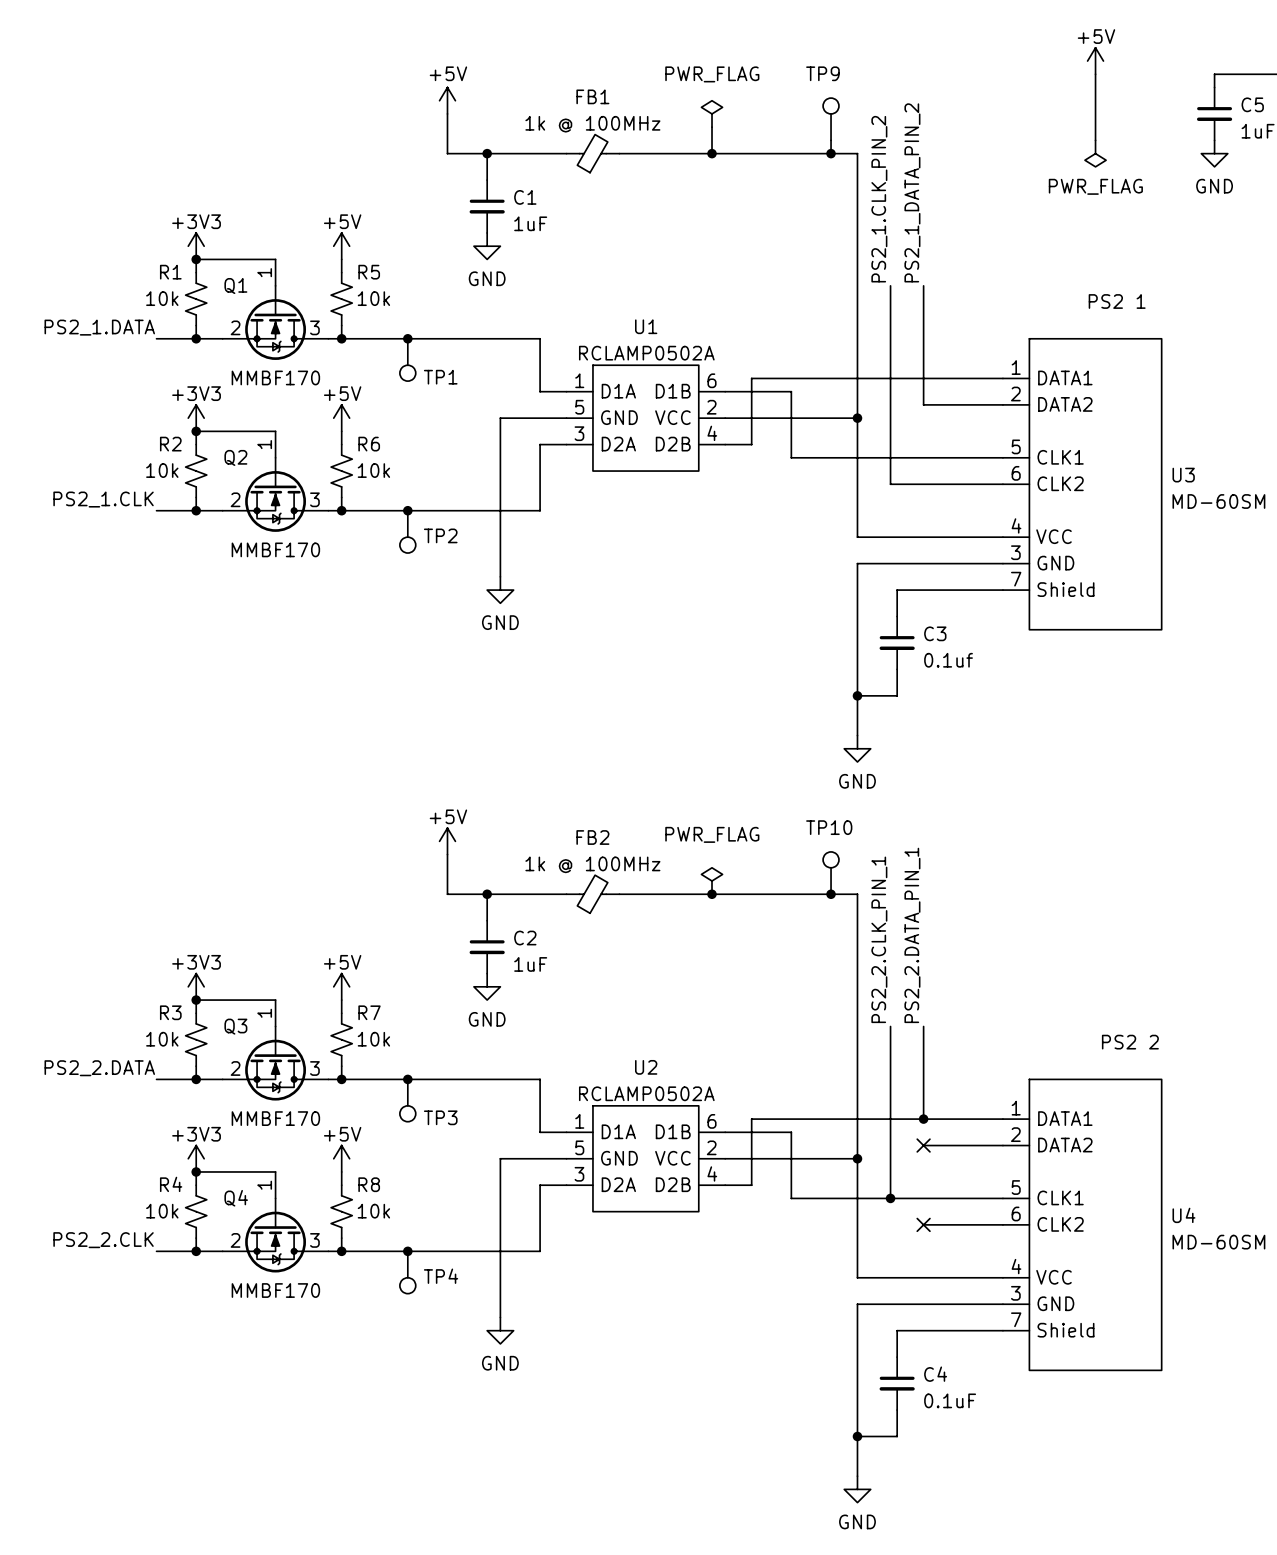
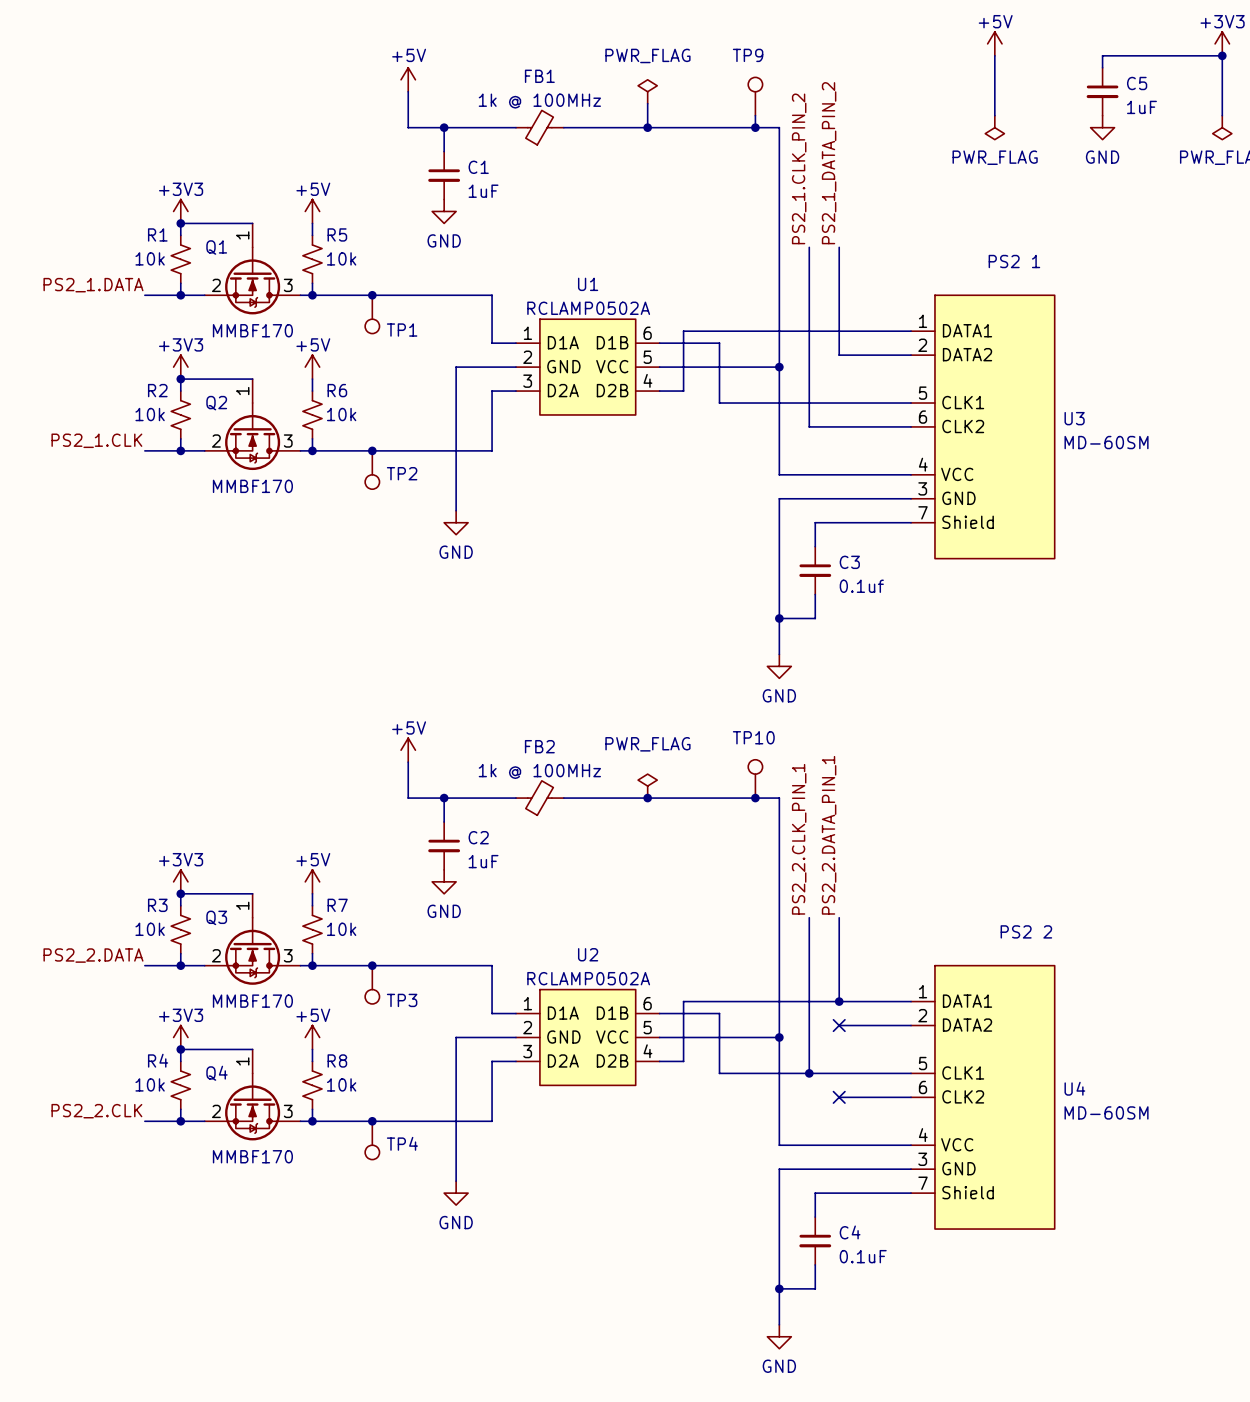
U1 pin number: 5 (579, 407) -> 2 (527, 357)
U1 pin number: 2 (711, 407) -> 5 (647, 357)
U2 pin number: 5 (579, 1147) -> 2 (527, 1027)
U2 pin number: 2 (711, 1147) -> 5 (647, 1027)

